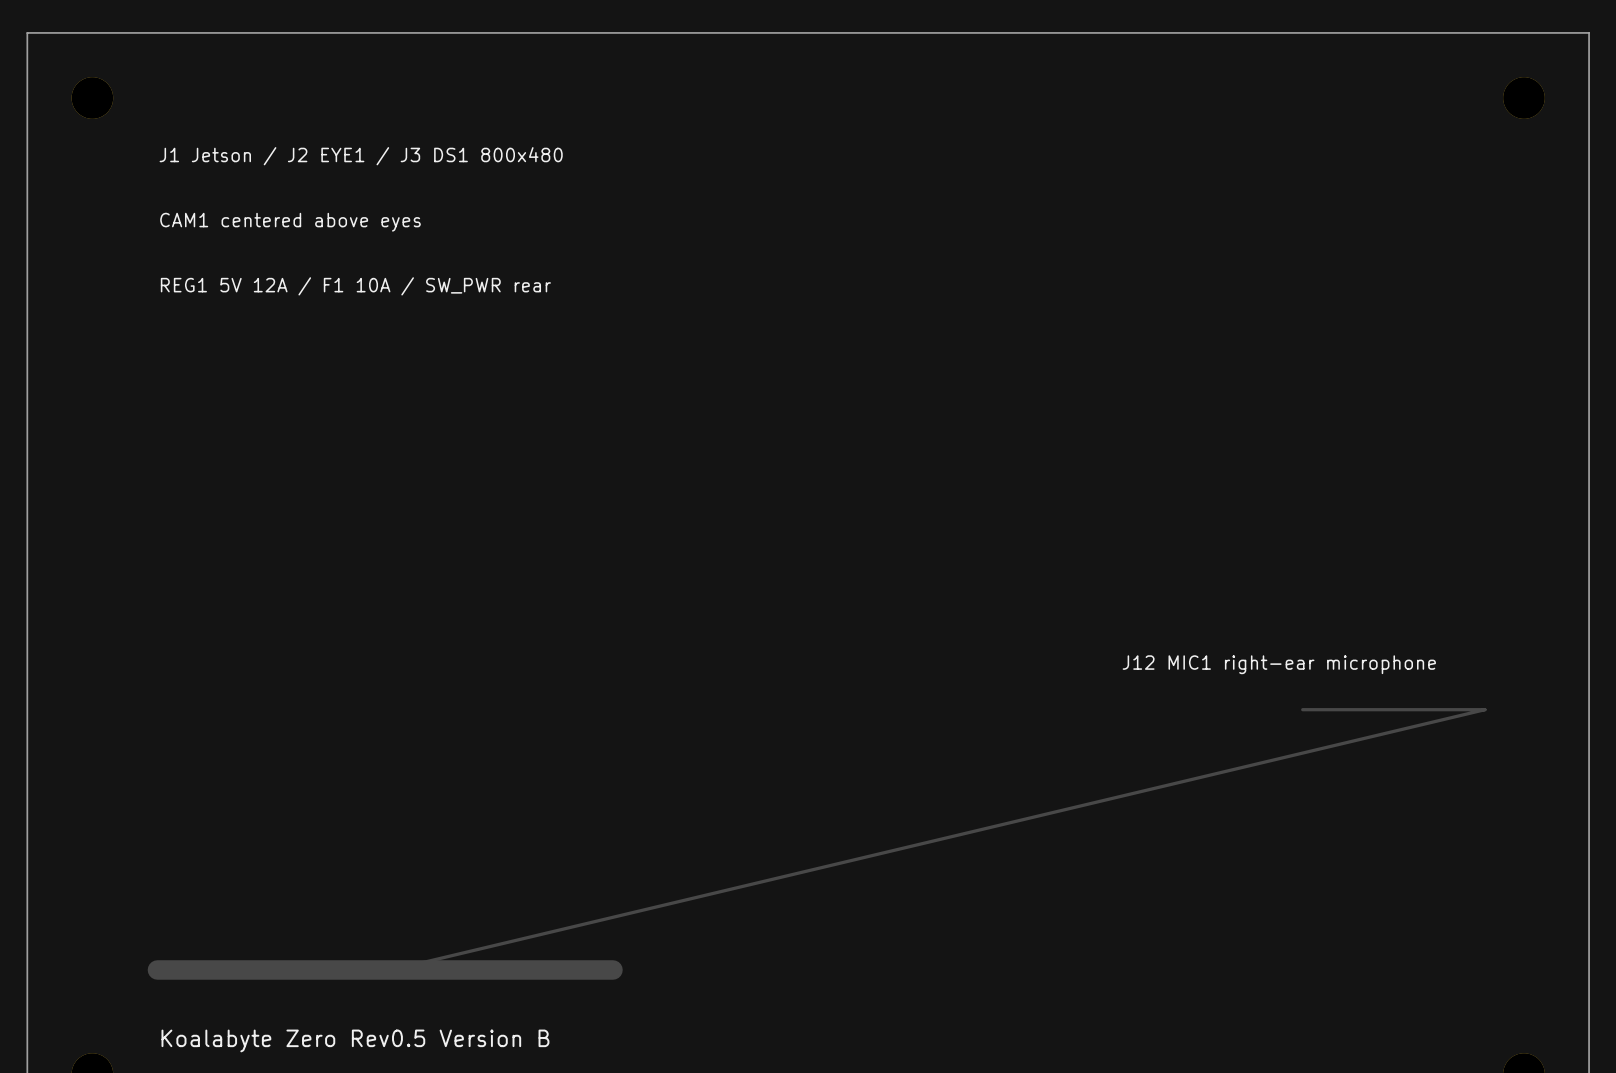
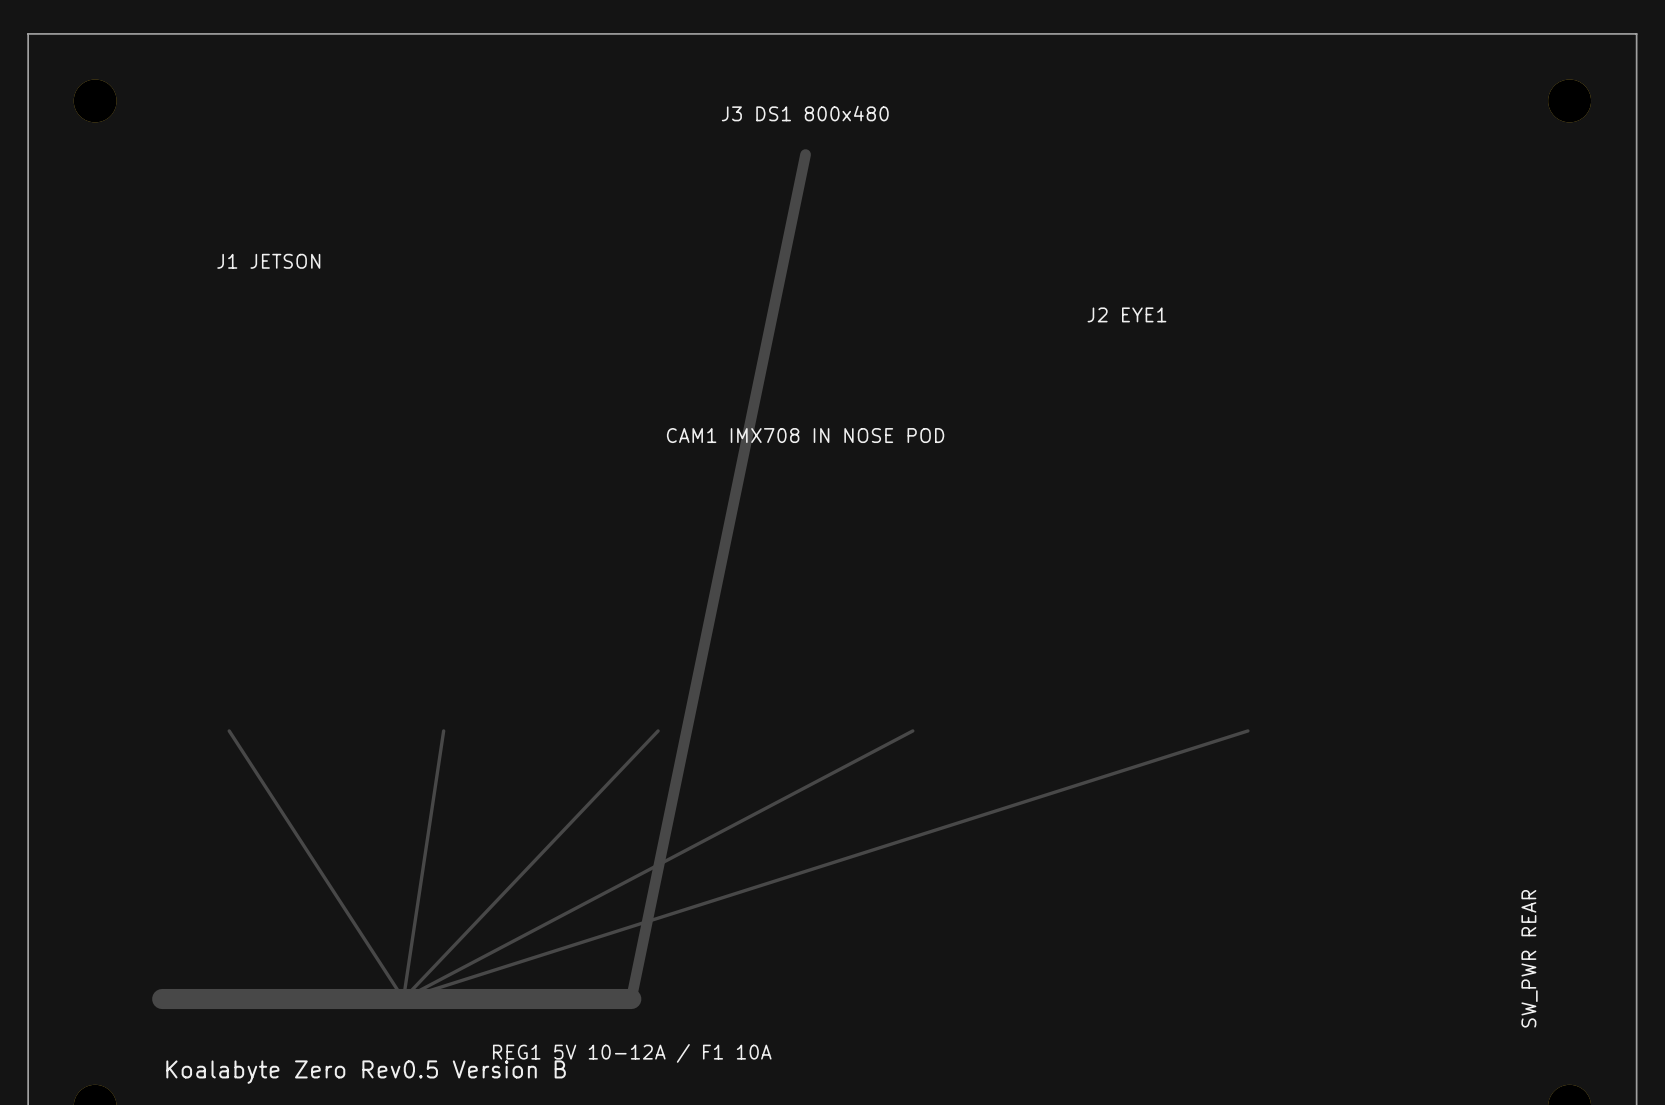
text: none -> J3 DS1 800x480 (805, 113)
track: none -> (805, 154) (631, 999)
text: J1 Jetson / J2 EYE1 / J3 DS1 800x480 (361, 156) -> none
text: CAM1 centered above eyes (290, 222) -> none
text: none -> J1 JETSON (268, 261)
text: REG1 5V 12A / F1 10A / SW_PWR rear (355, 286) -> none
text: none -> J2 EYE1 (1126, 314)
text: none -> CAM1 IMX708 IN NOSE POD (805, 435)
text: J12 MIC1 right-ear microphone (1279, 664) -> none
track: none -> (229, 730) (403, 999)
track: none -> (443, 730) (403, 999)
track: none -> (658, 730) (403, 999)
track: none -> (912, 730) (403, 999)
track: (1302, 709) (1484, 709) (391, 969) -> (1247, 730) (403, 999)
text: none -> SW_PWR REAR (1529, 958)
text: none -> REG1 5V 10-12A / F1 10A (632, 1053)

